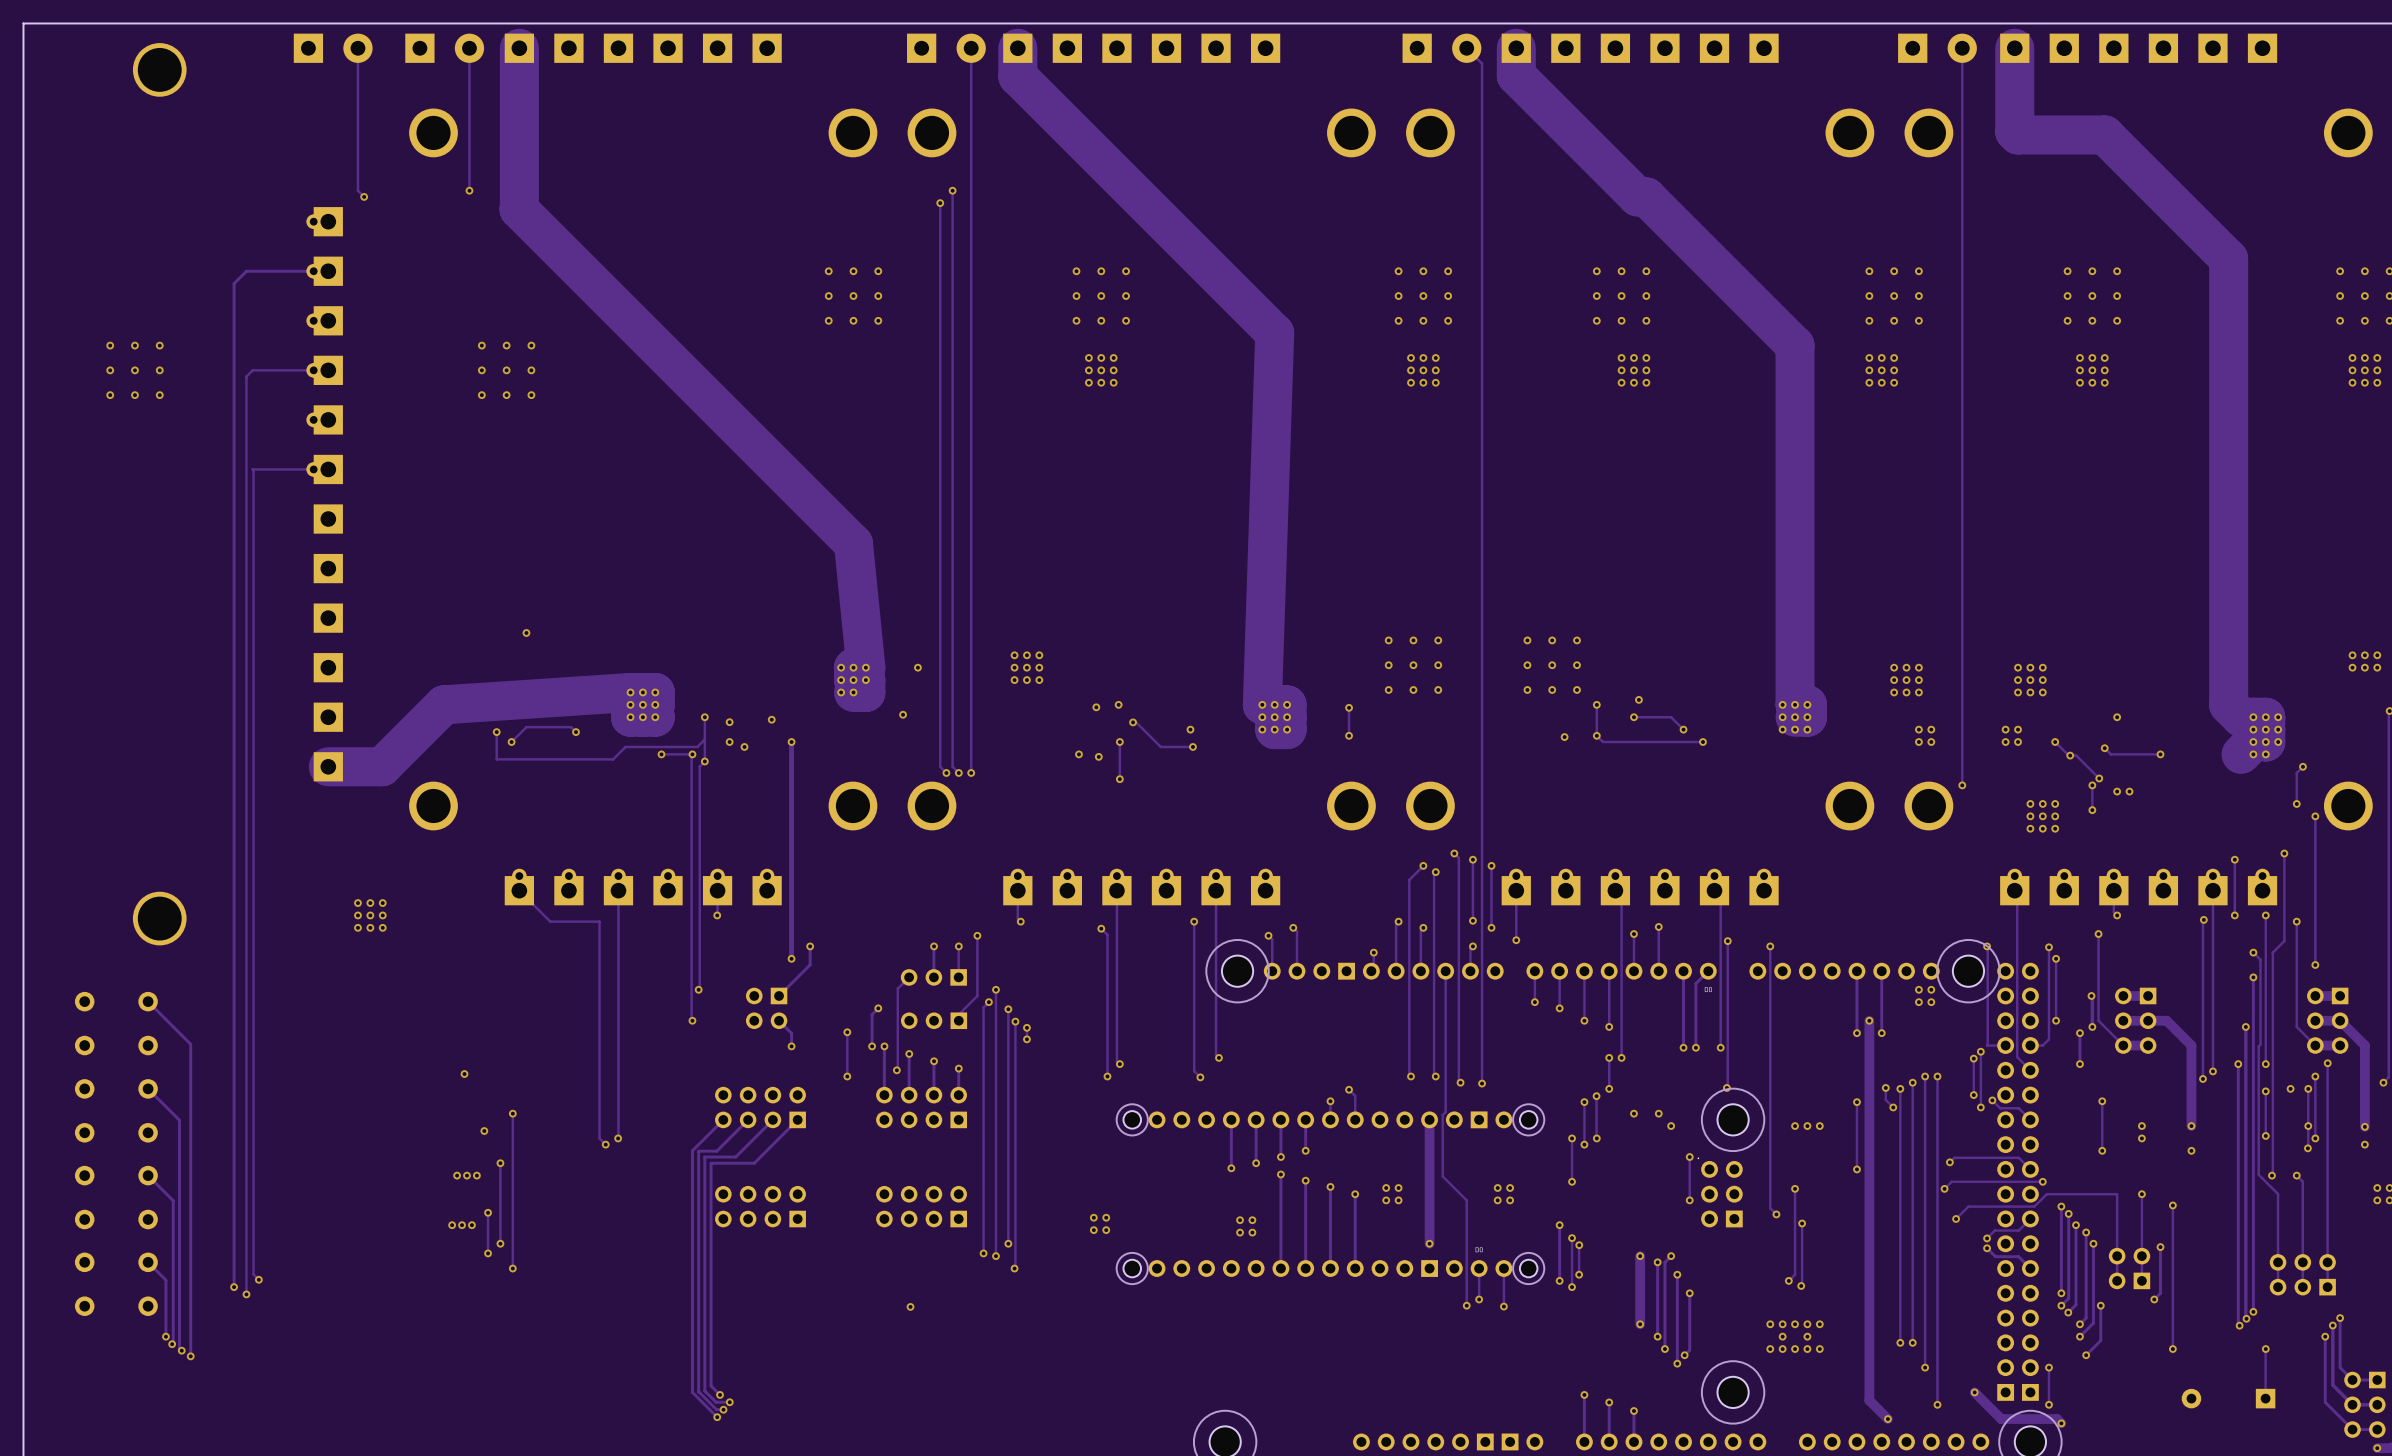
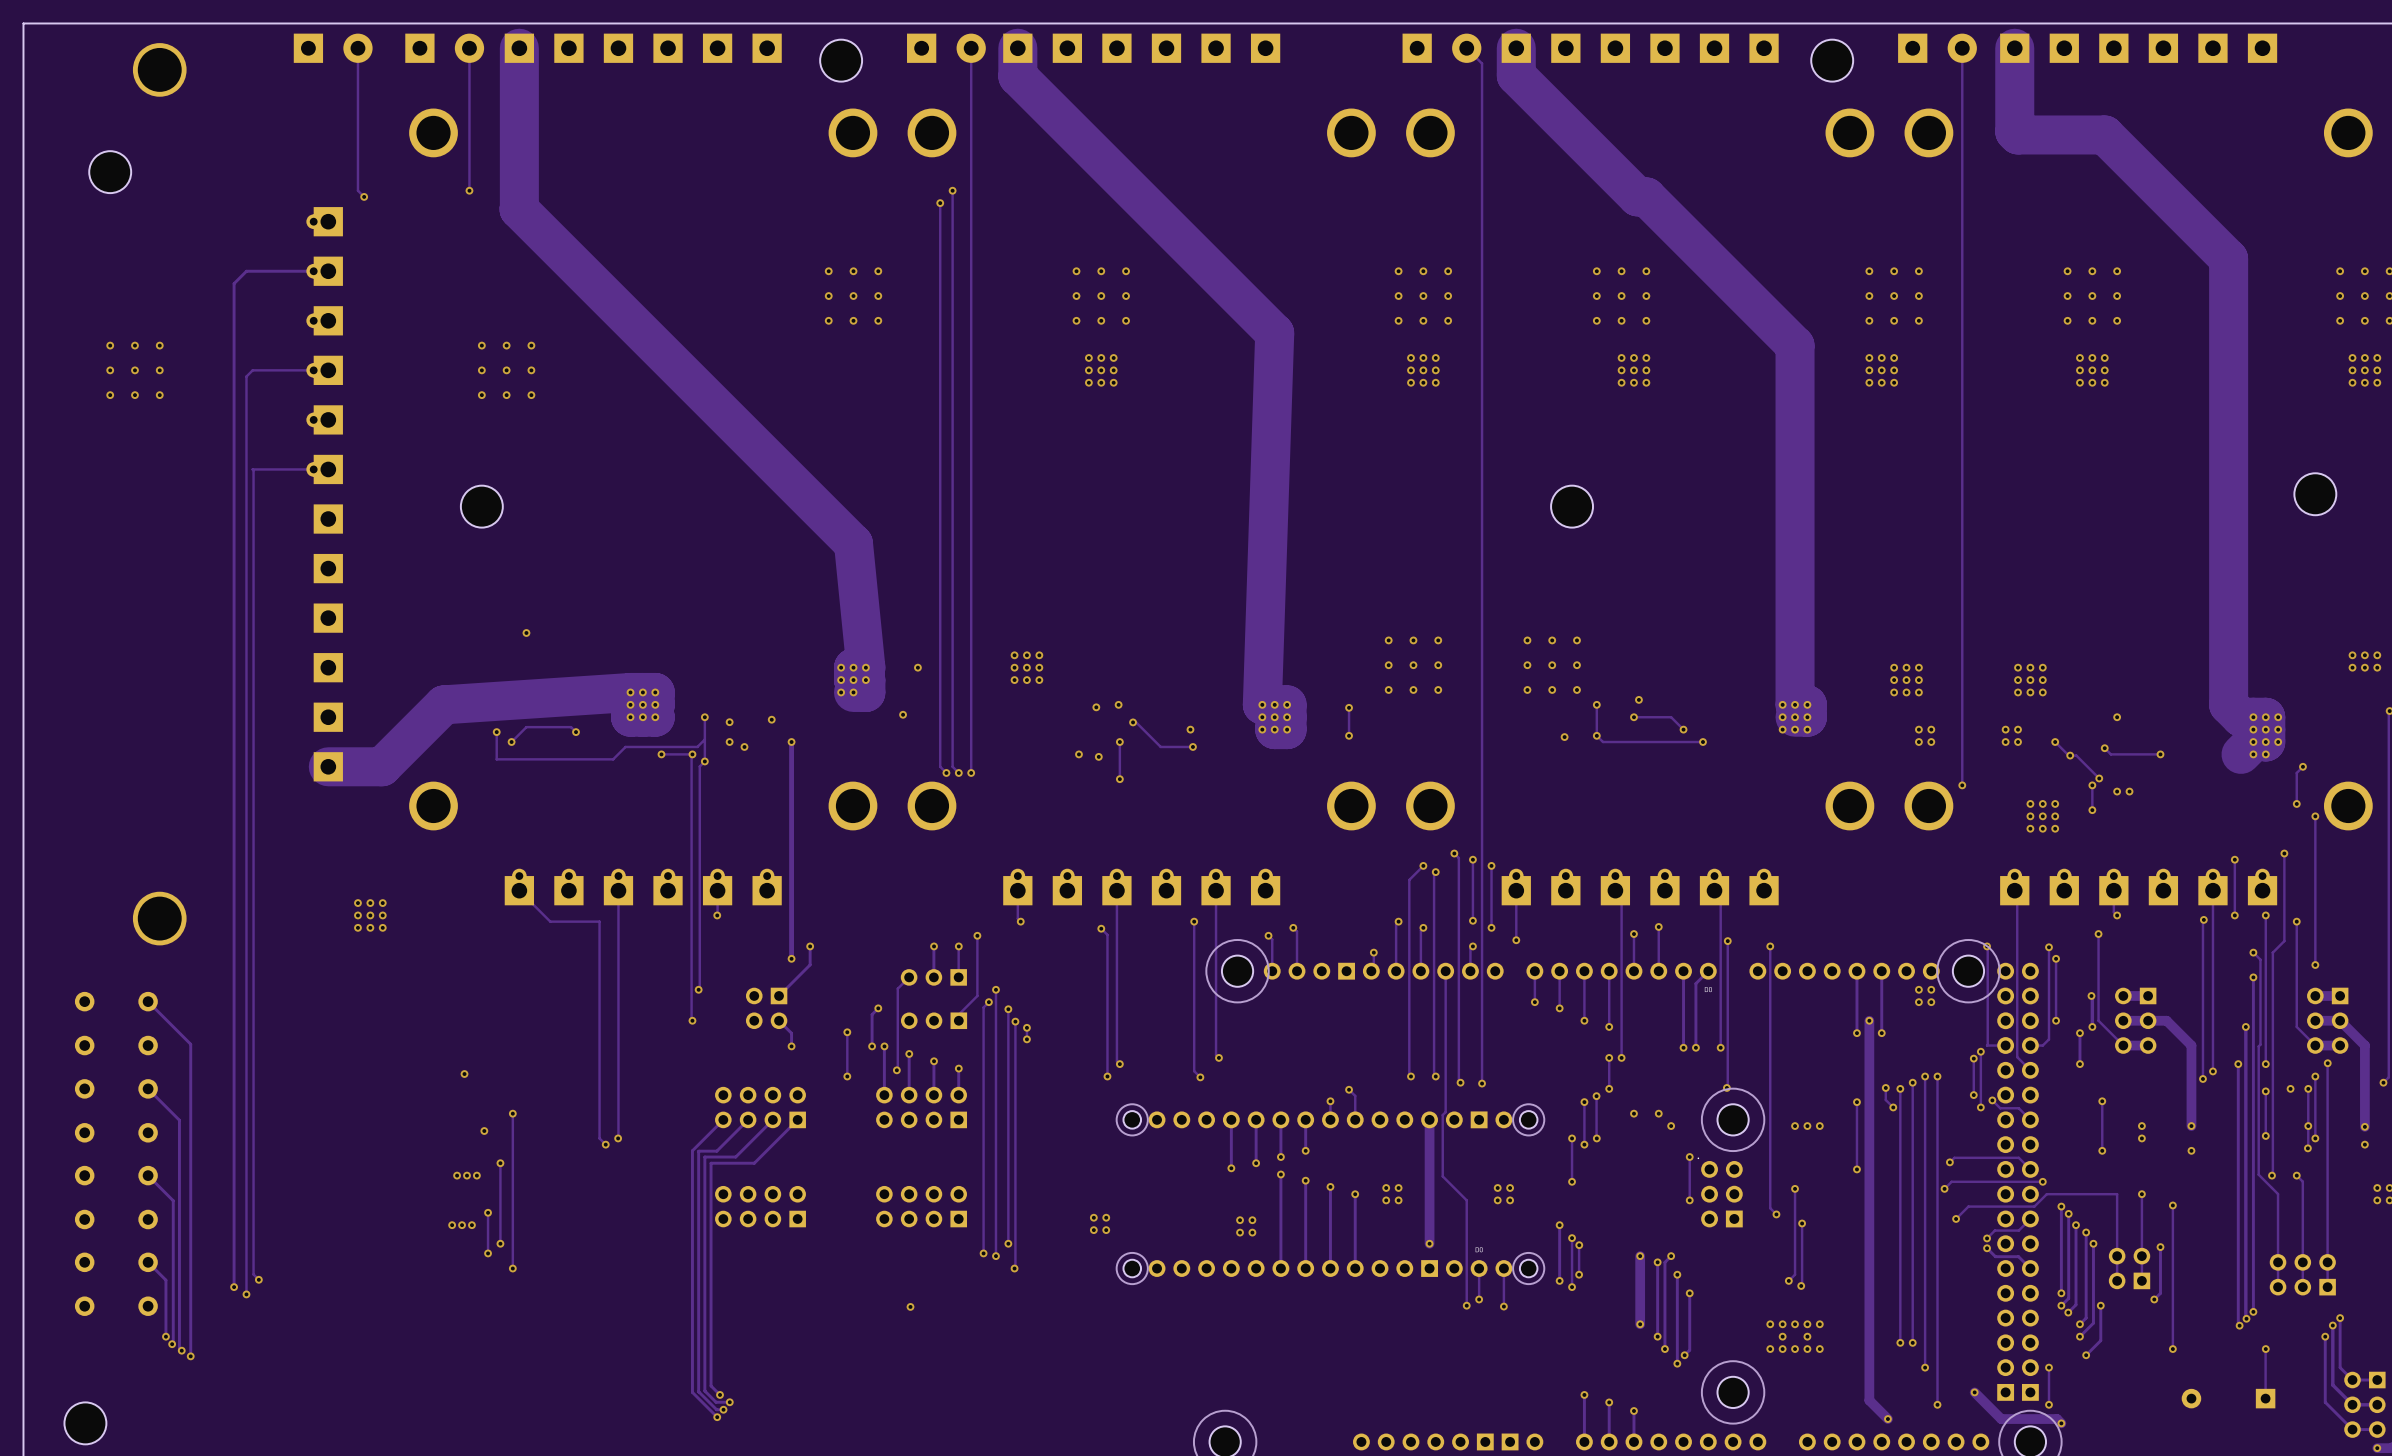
part: none -> (841, 60)
part: none -> (1832, 60)
part: none -> (110, 172)
part: none -> (2315, 494)
part: none -> (481, 506)
part: none -> (1572, 506)
part: none -> (85, 1423)

